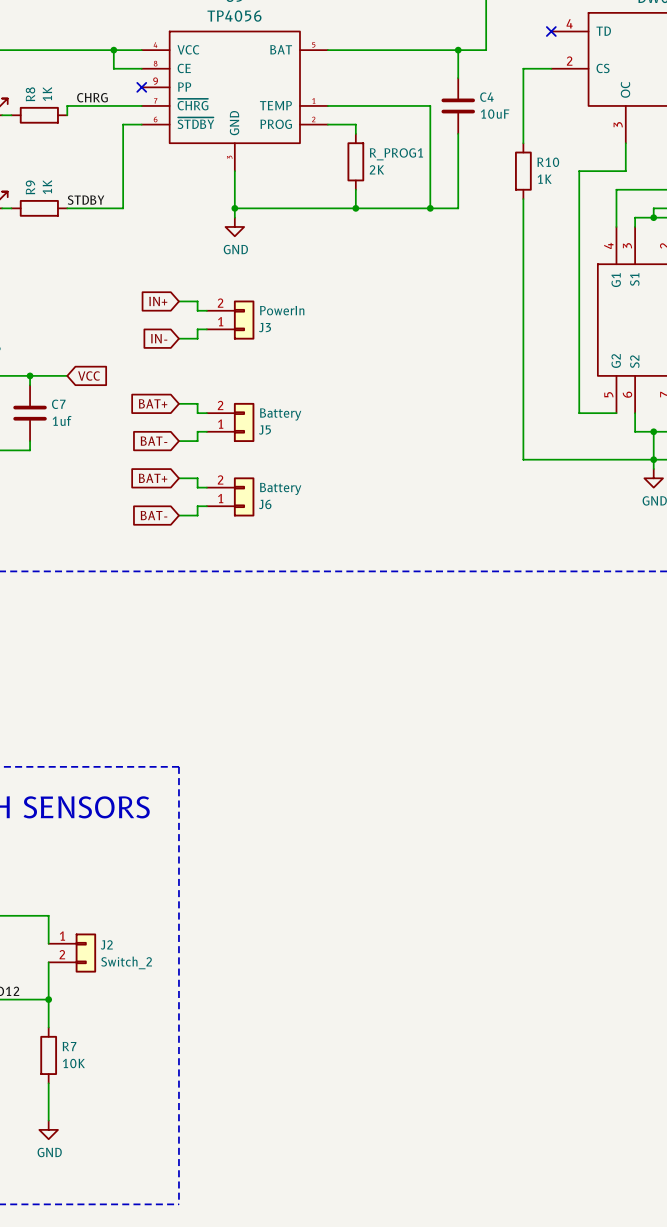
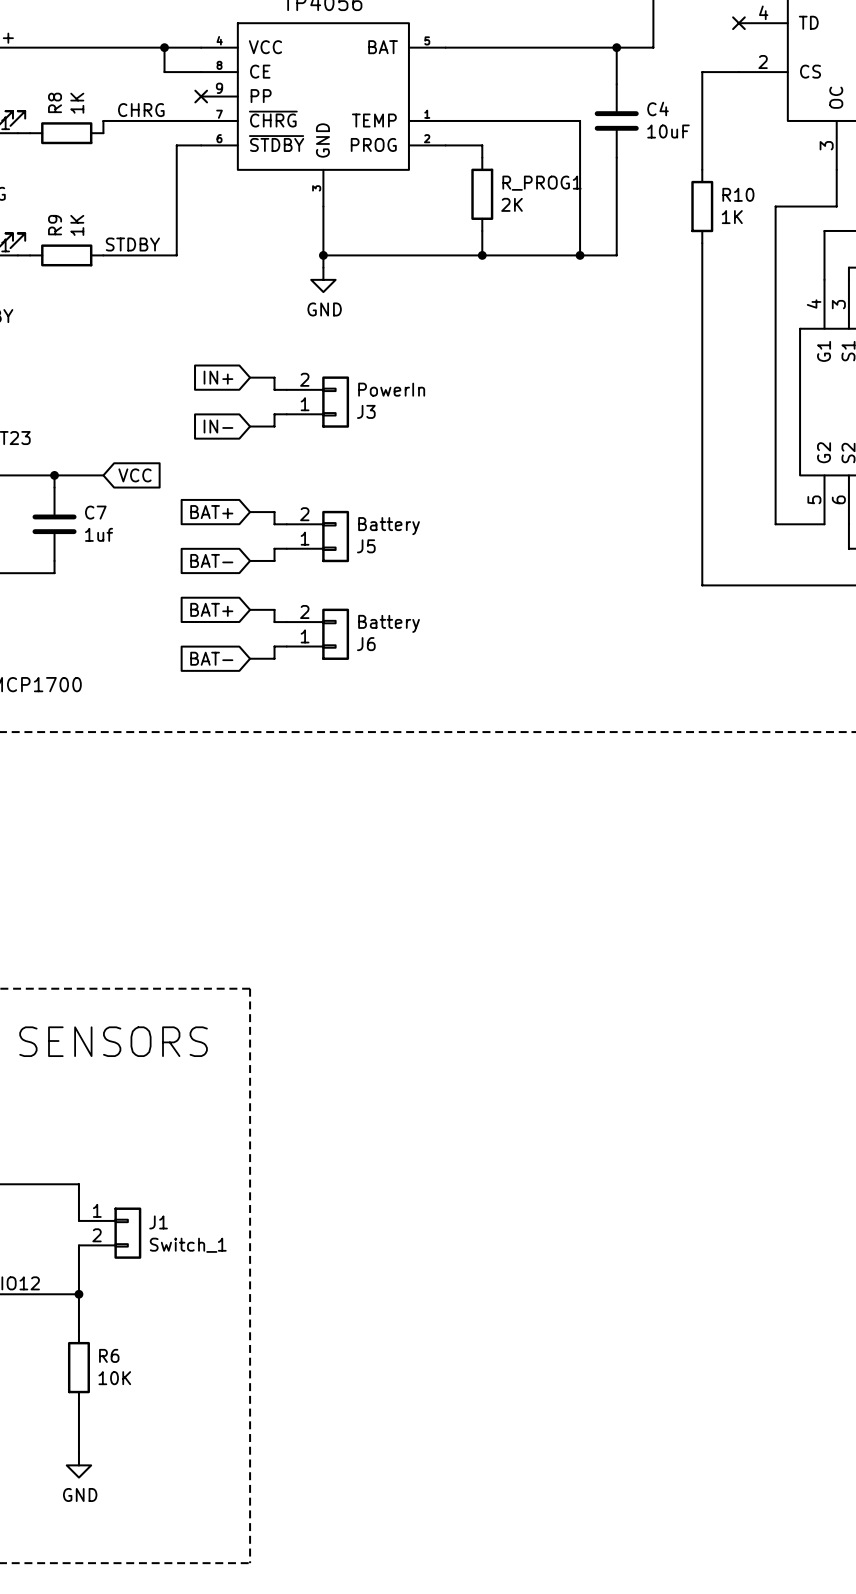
J2 name: J2 (106, 944) -> J1 (158, 1222)
J2 value: Switch_2 (126, 962) -> Switch_1 (188, 1245)
R7 name: R7 (69, 1046) -> R6 (109, 1355)

